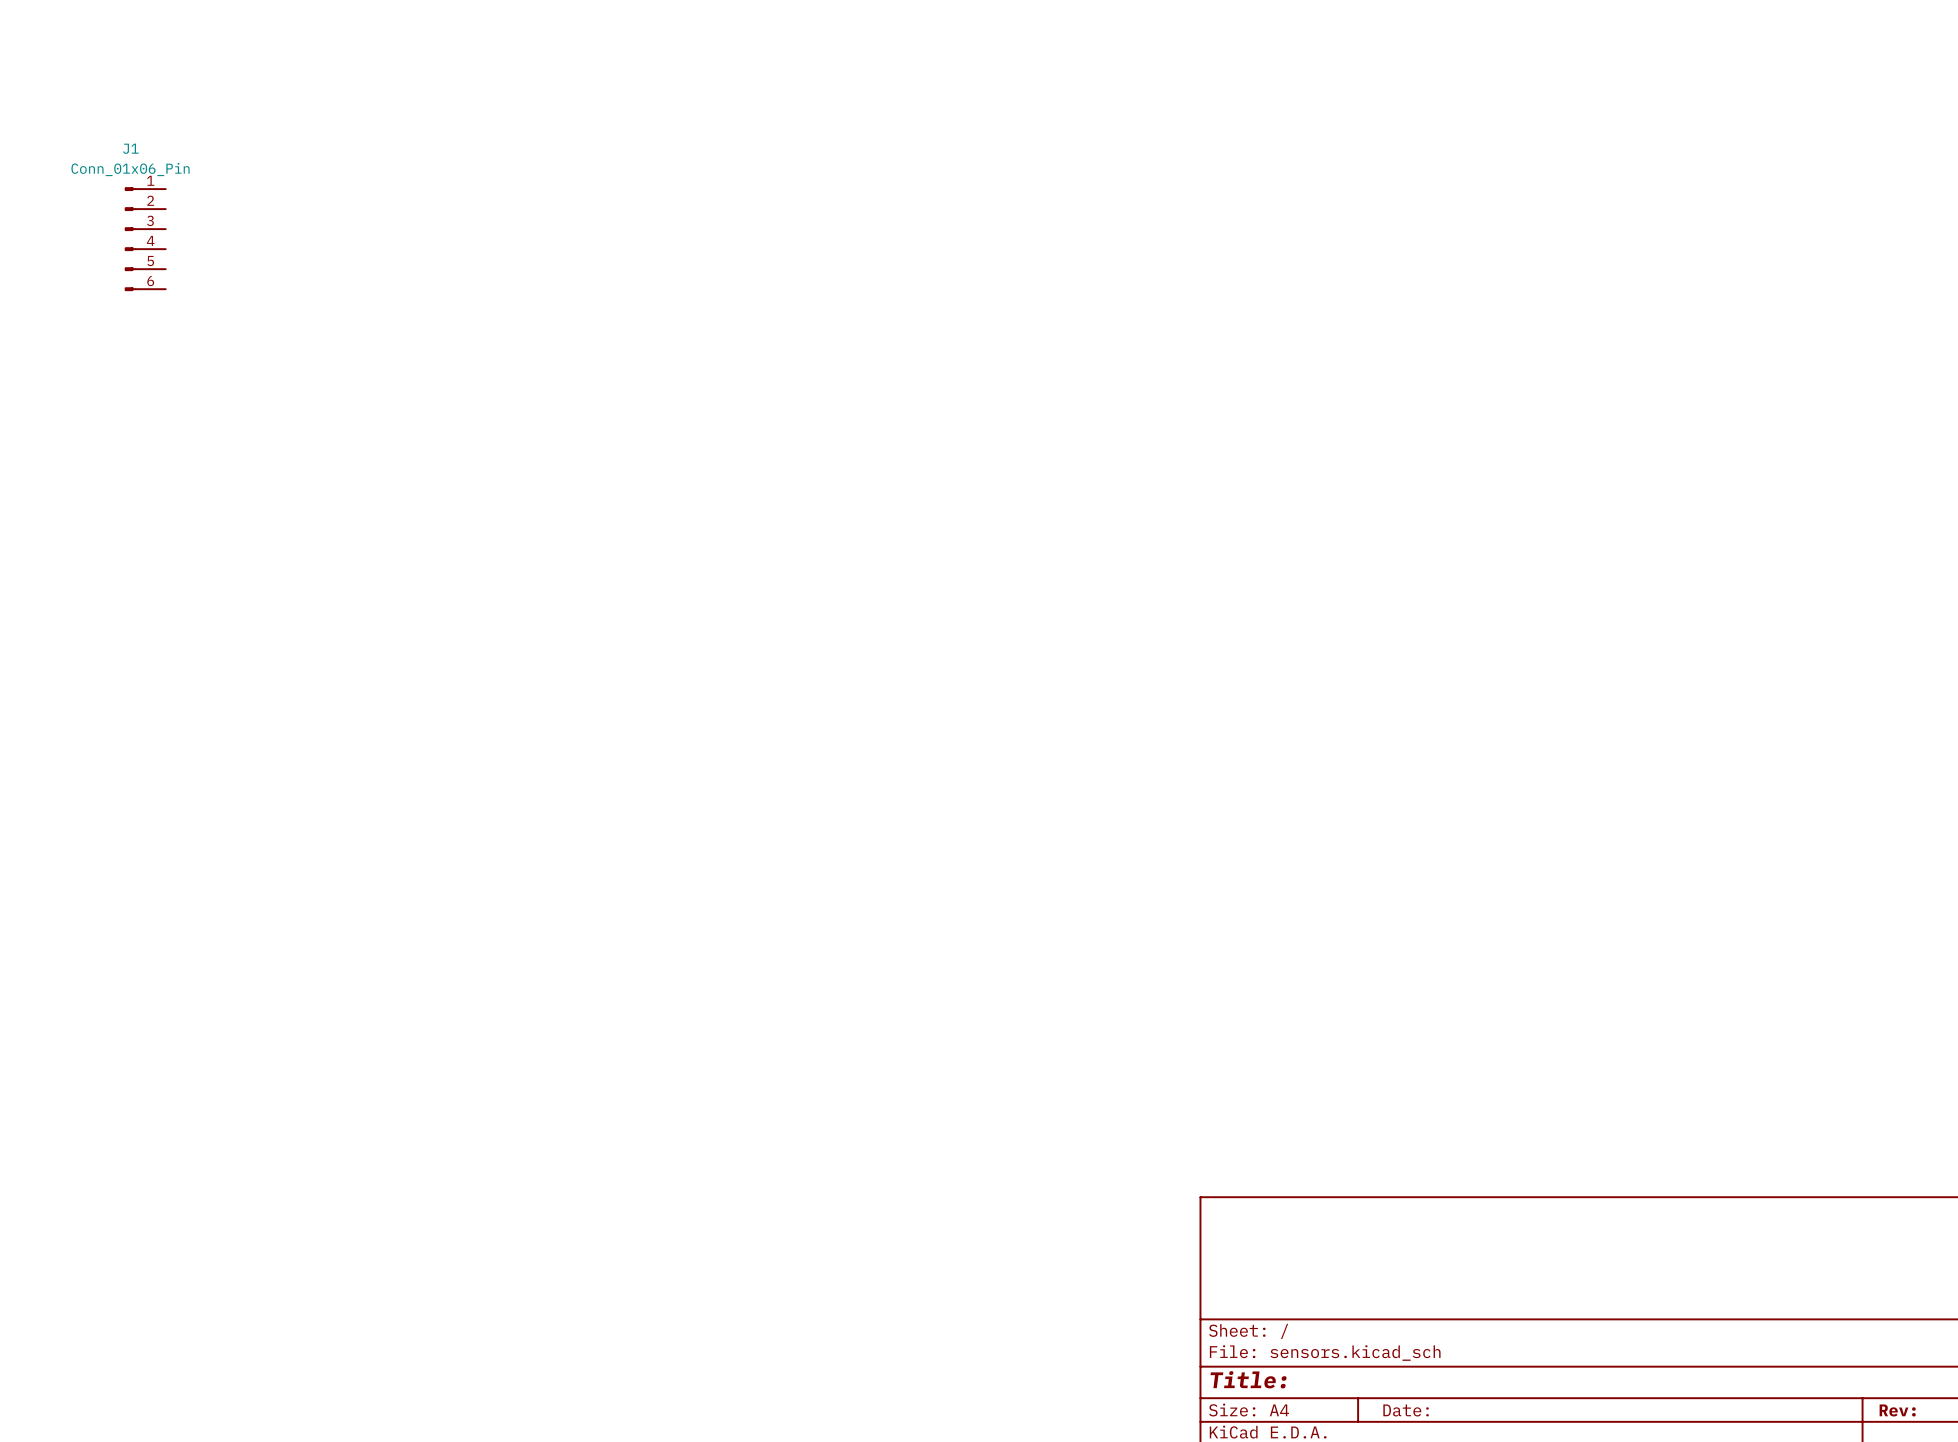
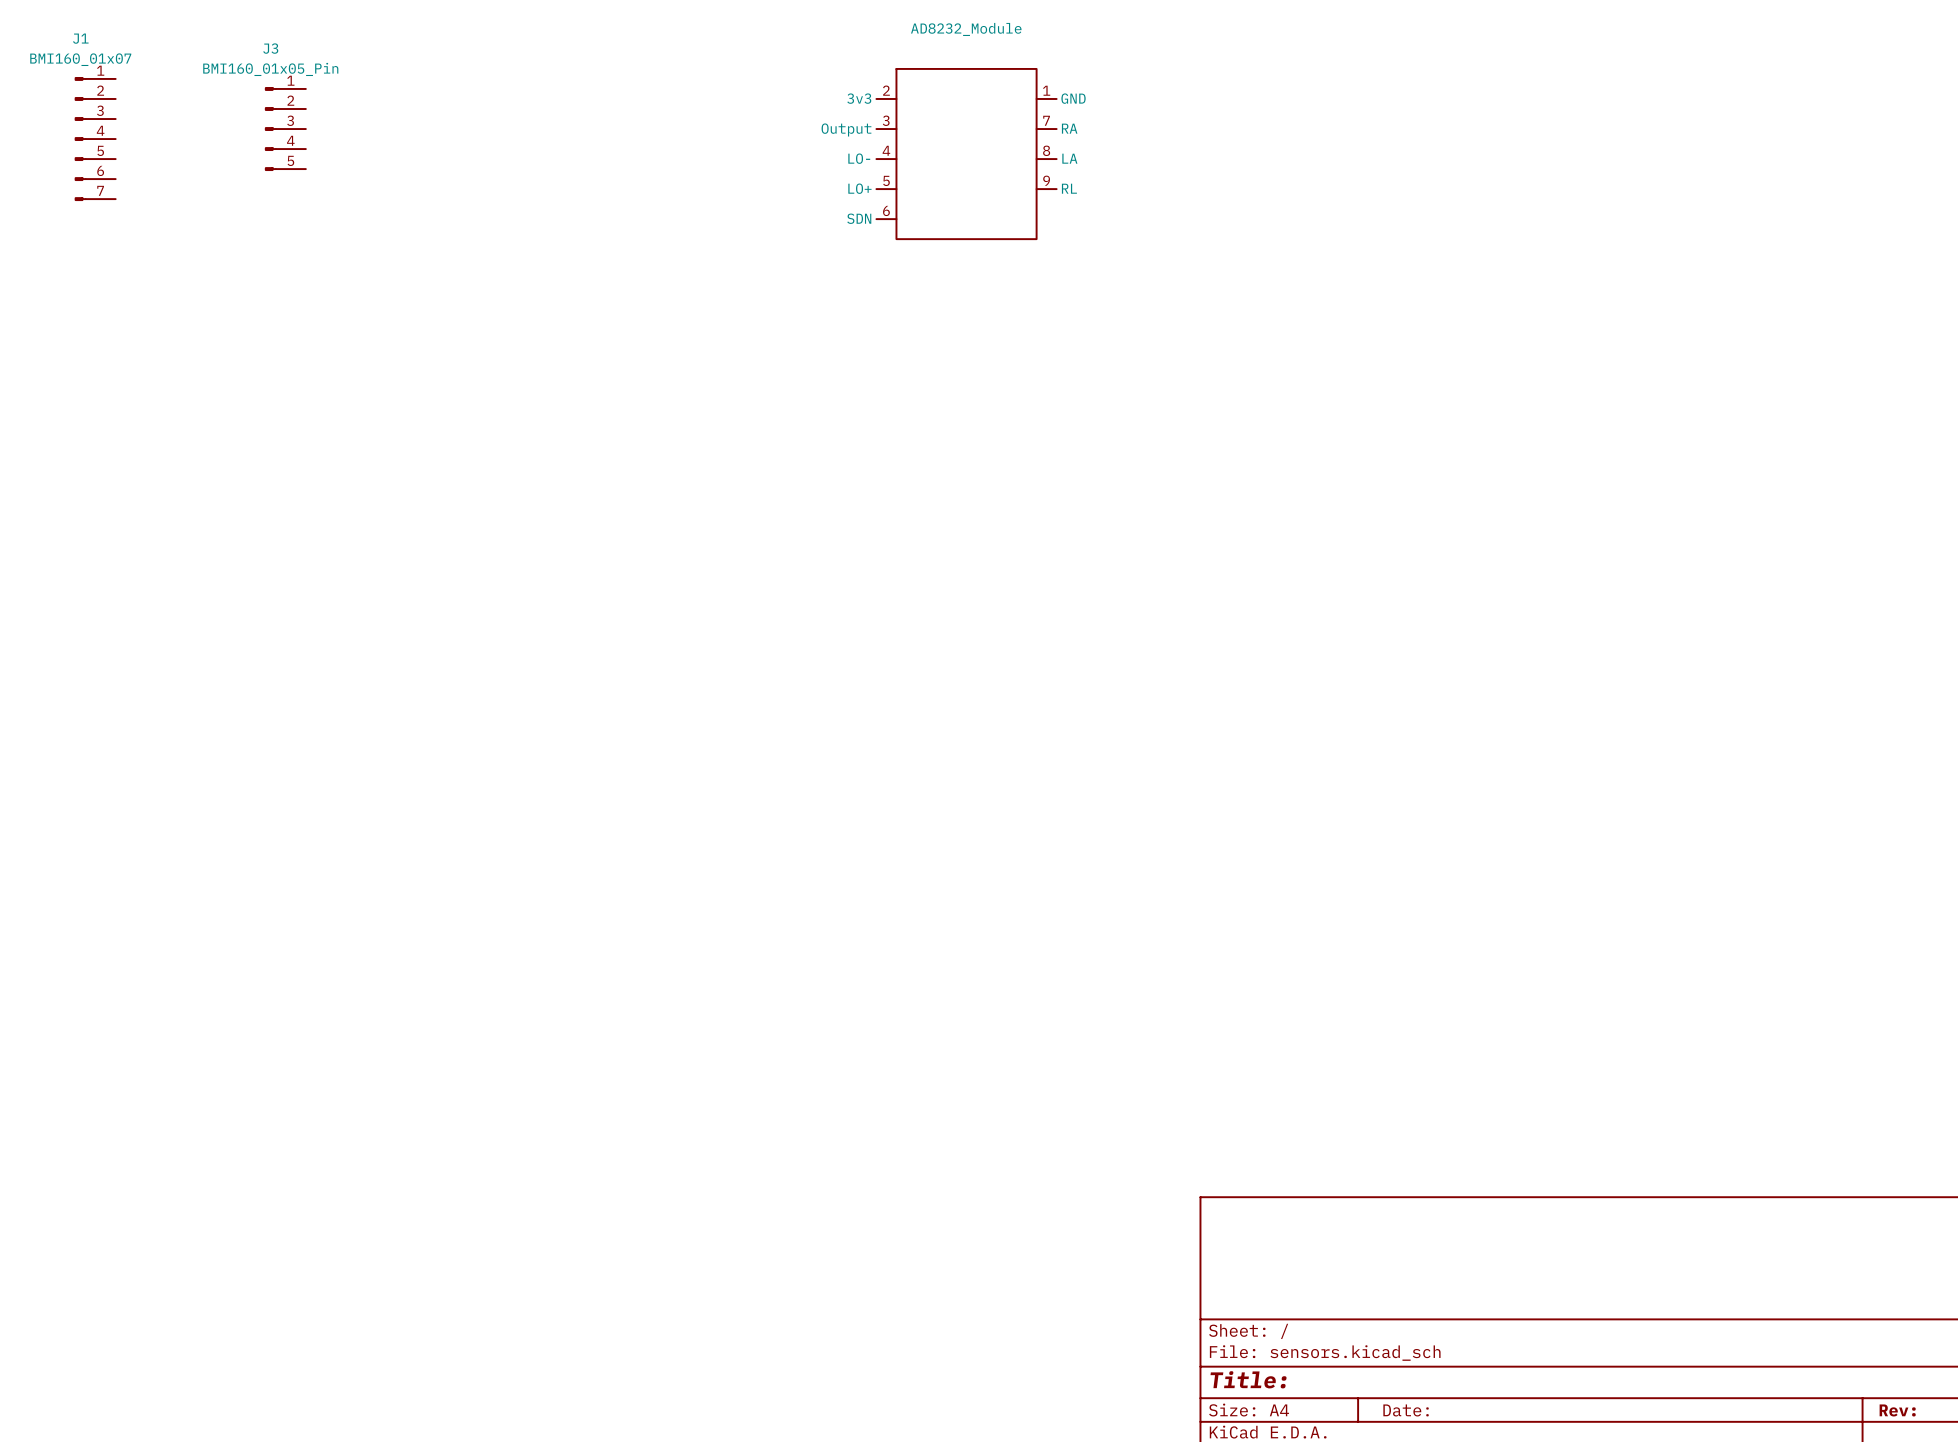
J3: none -> BMI160_01x05_Pin (285, 129)
AD8232_Module: none -> (966, 154)
J1 value: Conn_01x06_Pin (130, 169) -> BMI160_01x07 (80, 59)
J1 symbol: [125, 187, 166, 291] -> [75, 77, 116, 201]

